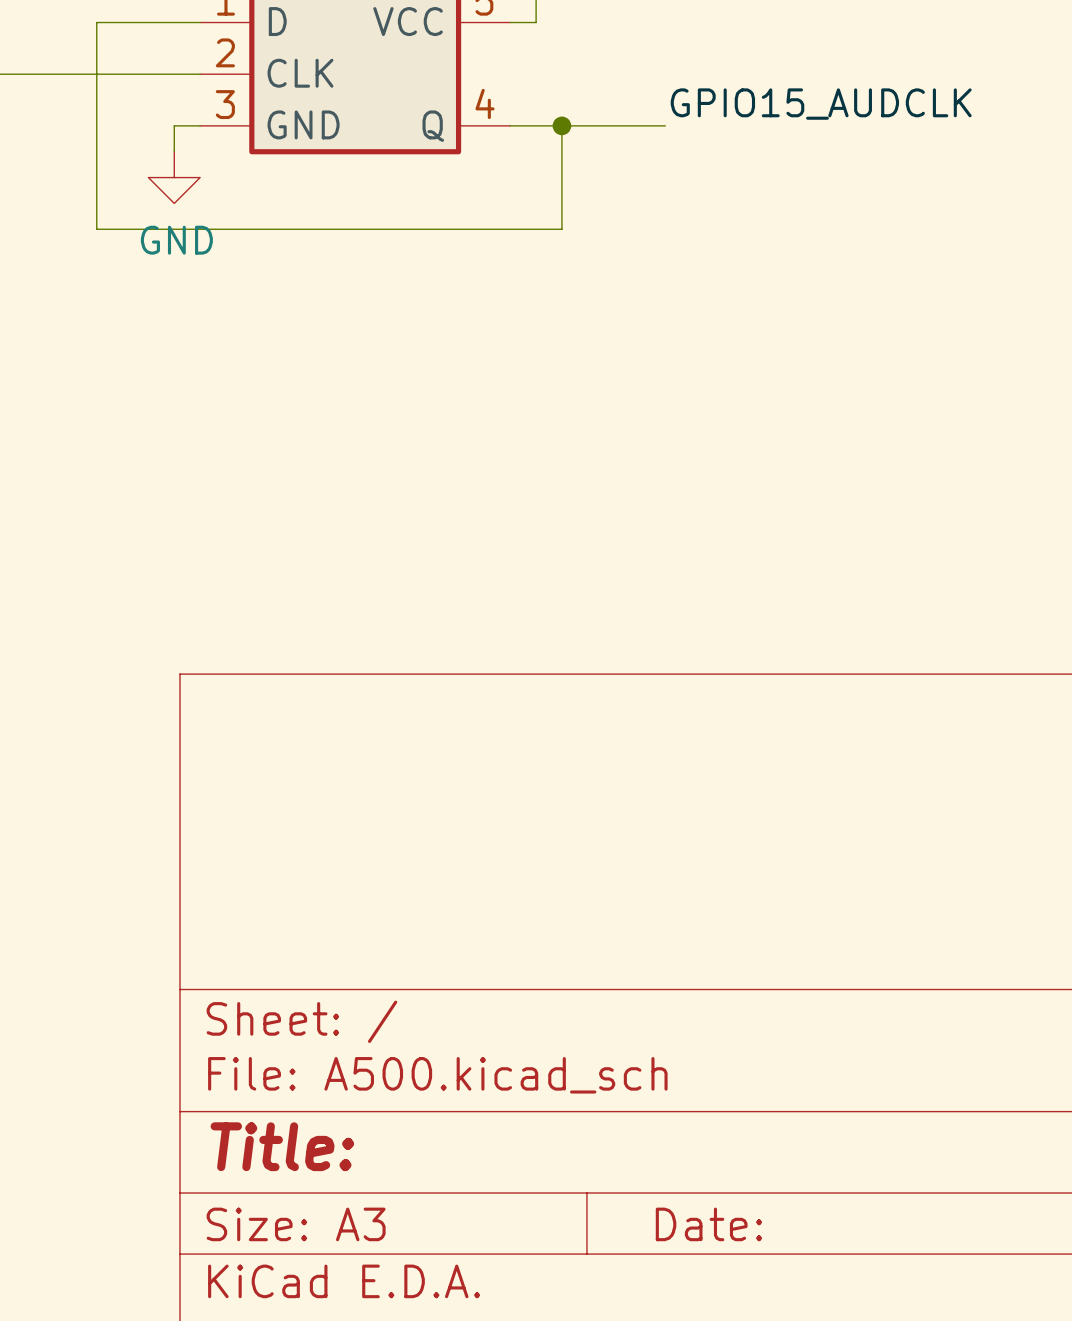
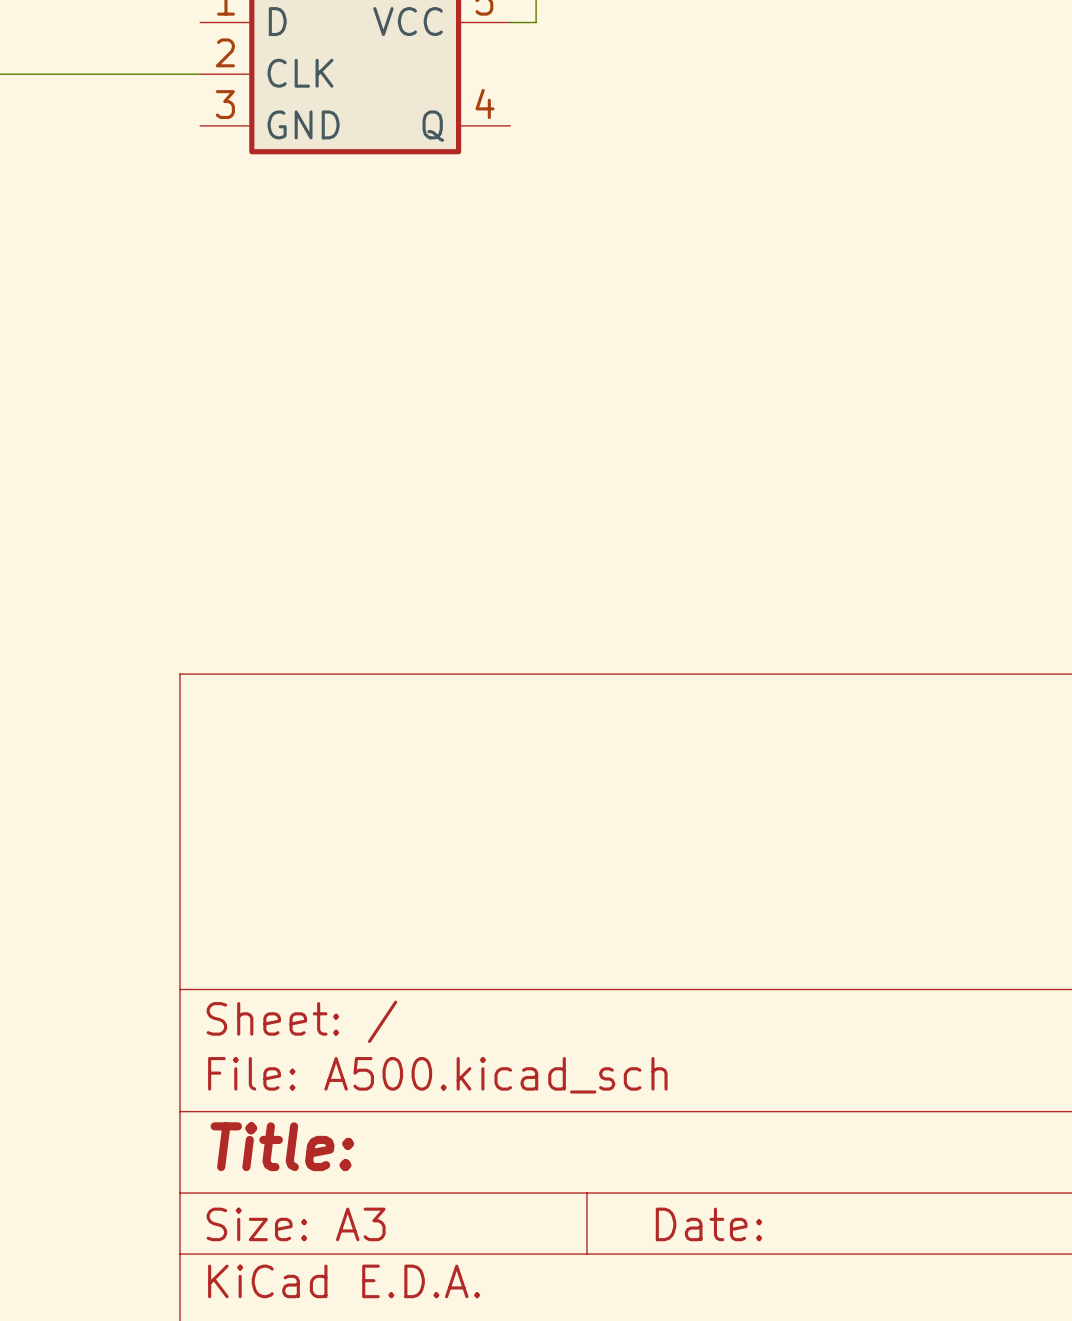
wire: (200, 22) (96, 22) (96, 229) (561, 229) (561, 125) -> none
label: GPIO15_AUDCLK (821, 104) -> none
wire: (200, 125) (174, 125) (174, 151) -> none
wire: (510, 125) (665, 125) -> none
junction: (561, 125) -> none
power symbol: GND (174, 177) -> none

